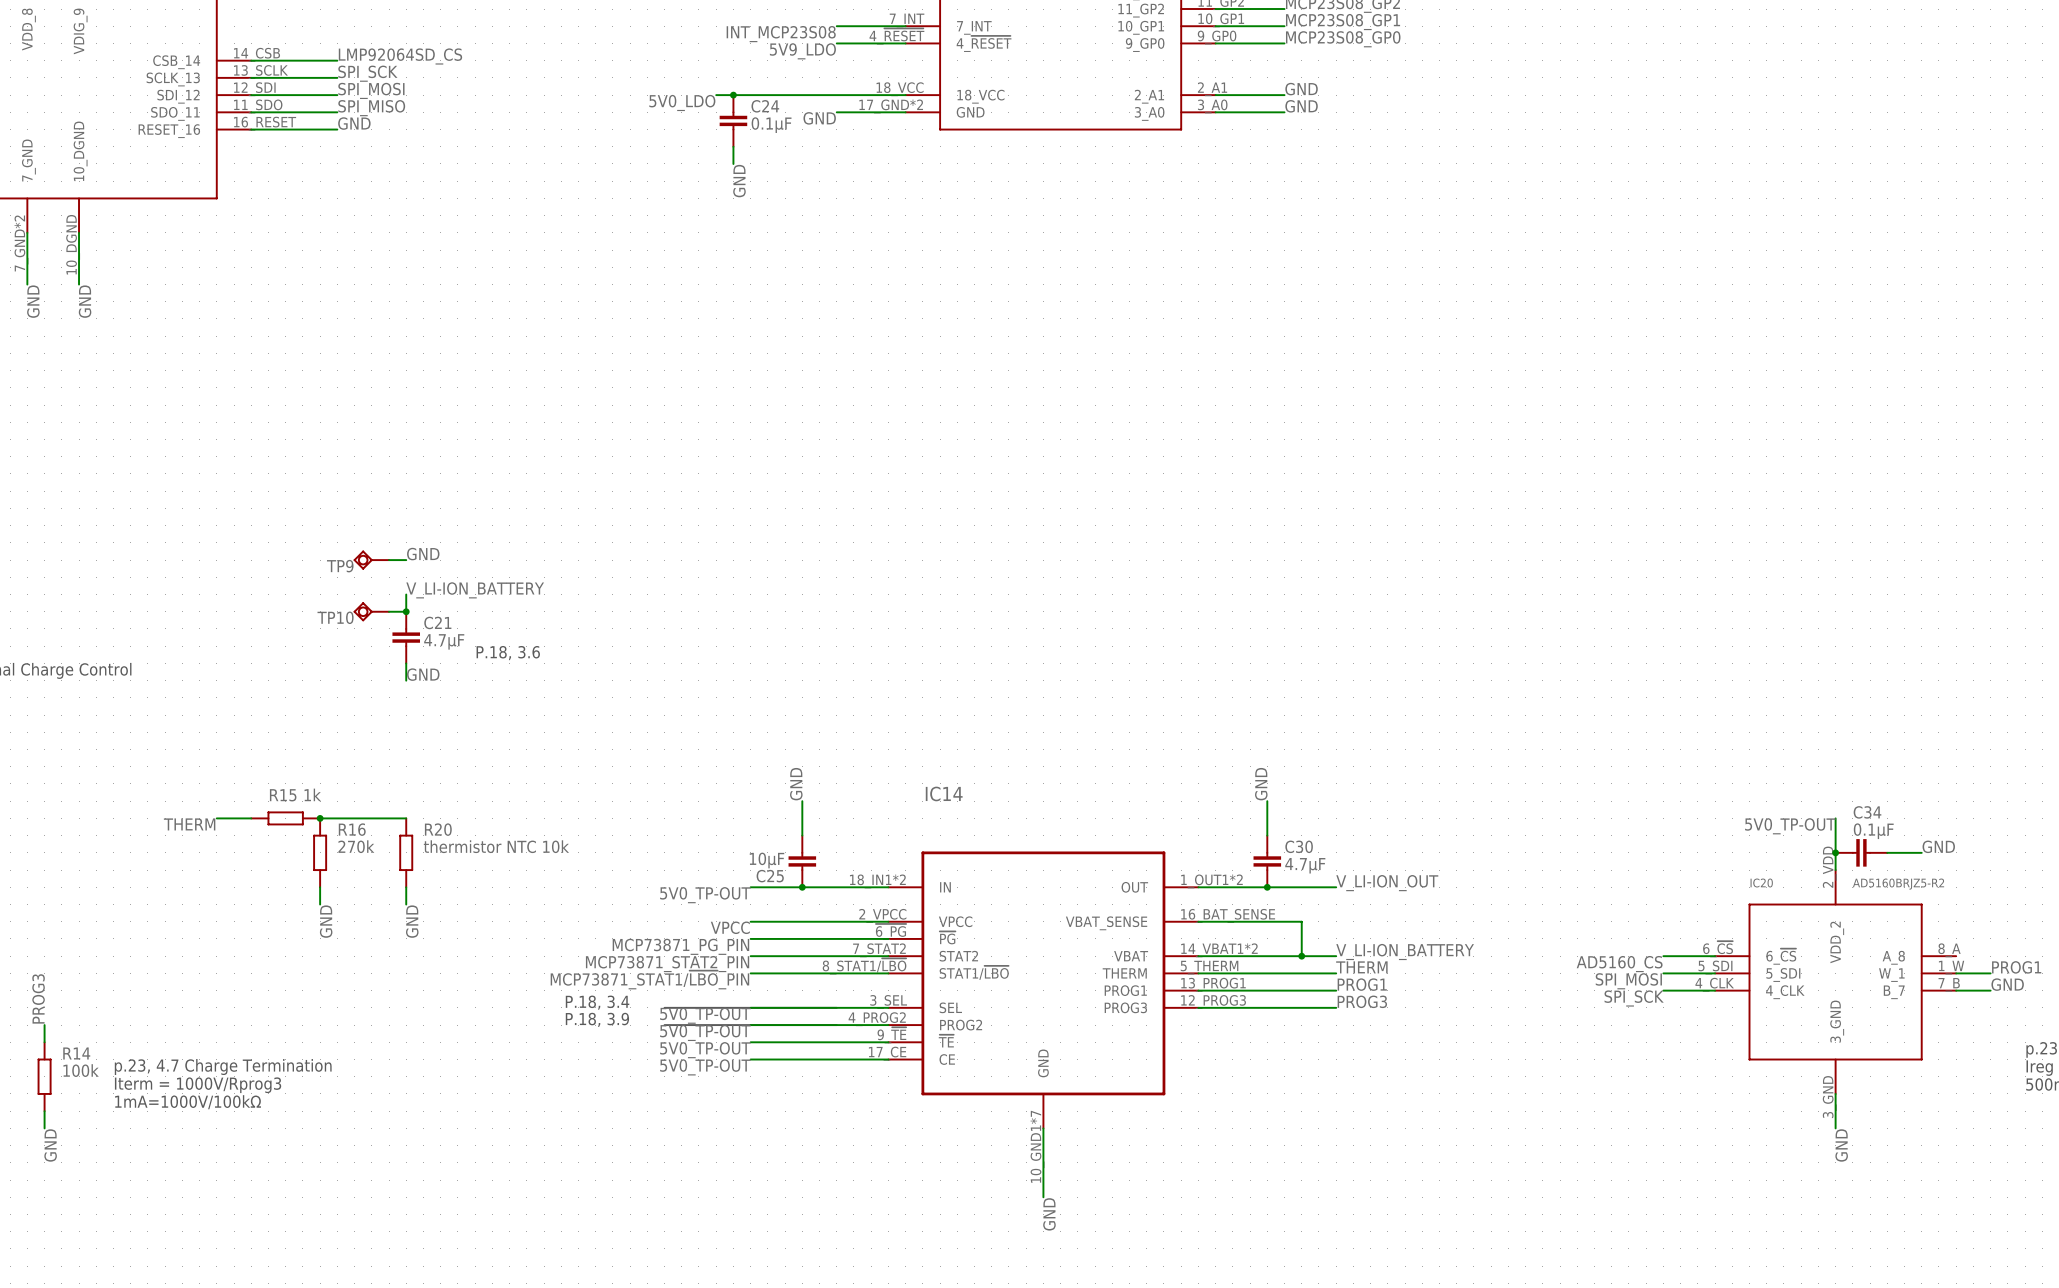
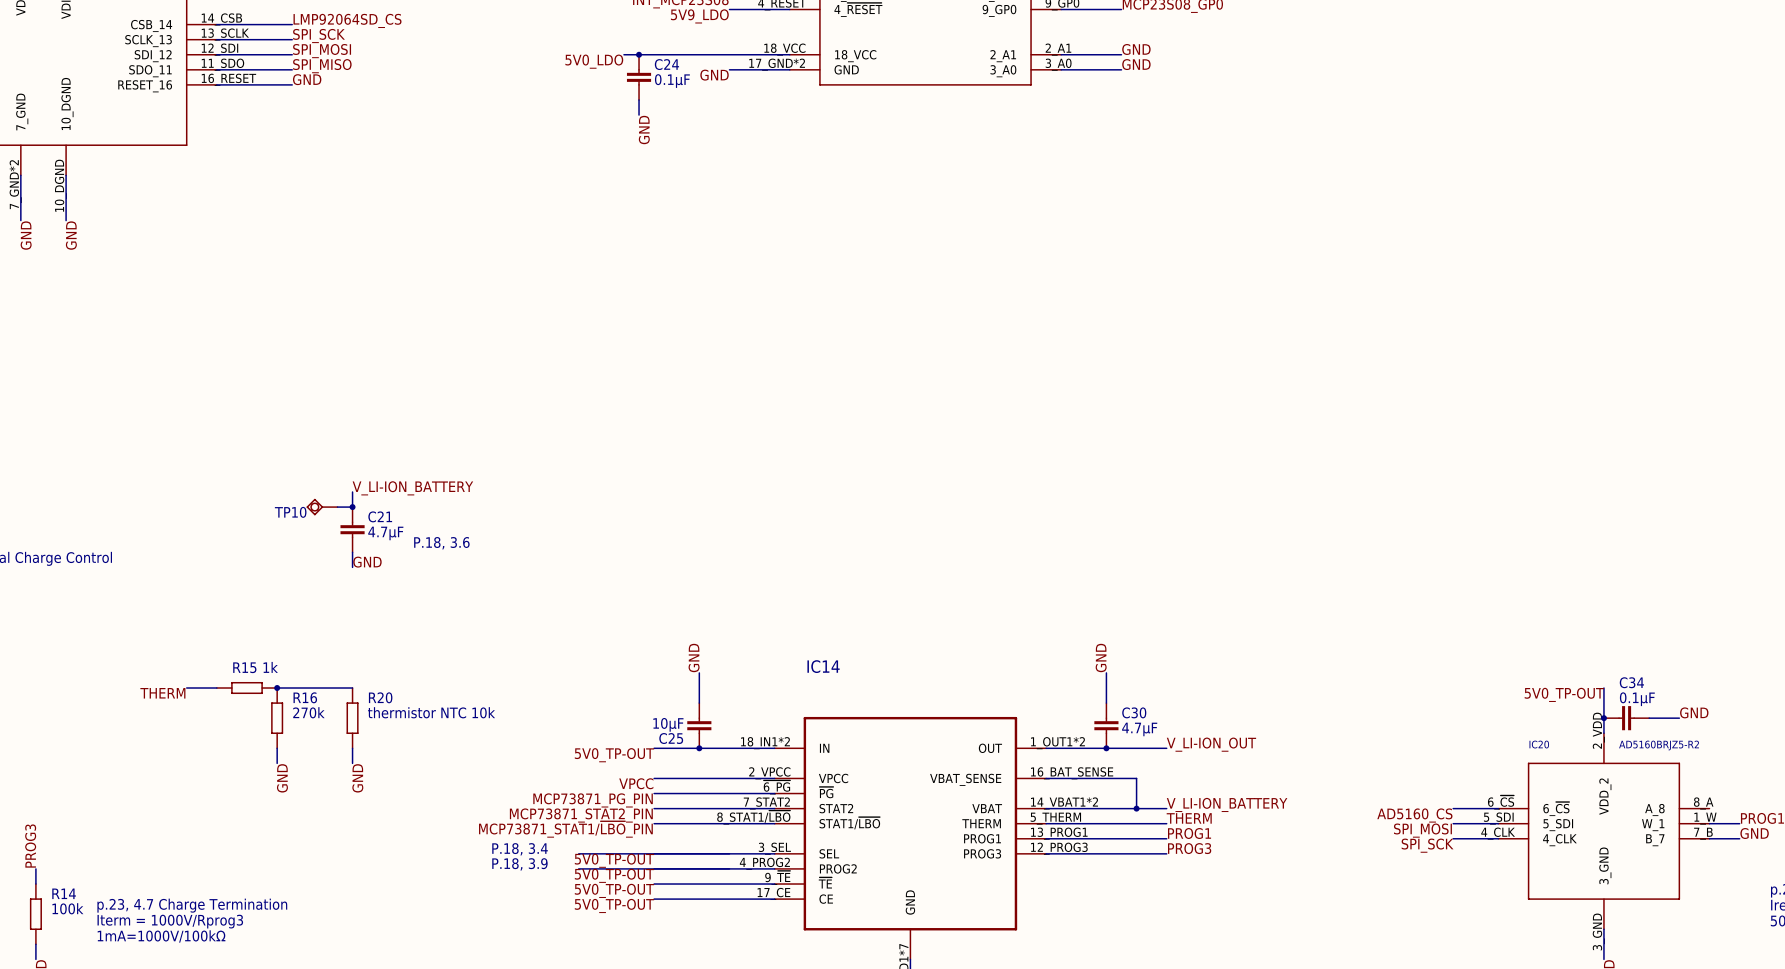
label: GND (423, 554) -> none
TP9: (371, 560) -> none
wire: (389, 560) (406, 560) -> none

